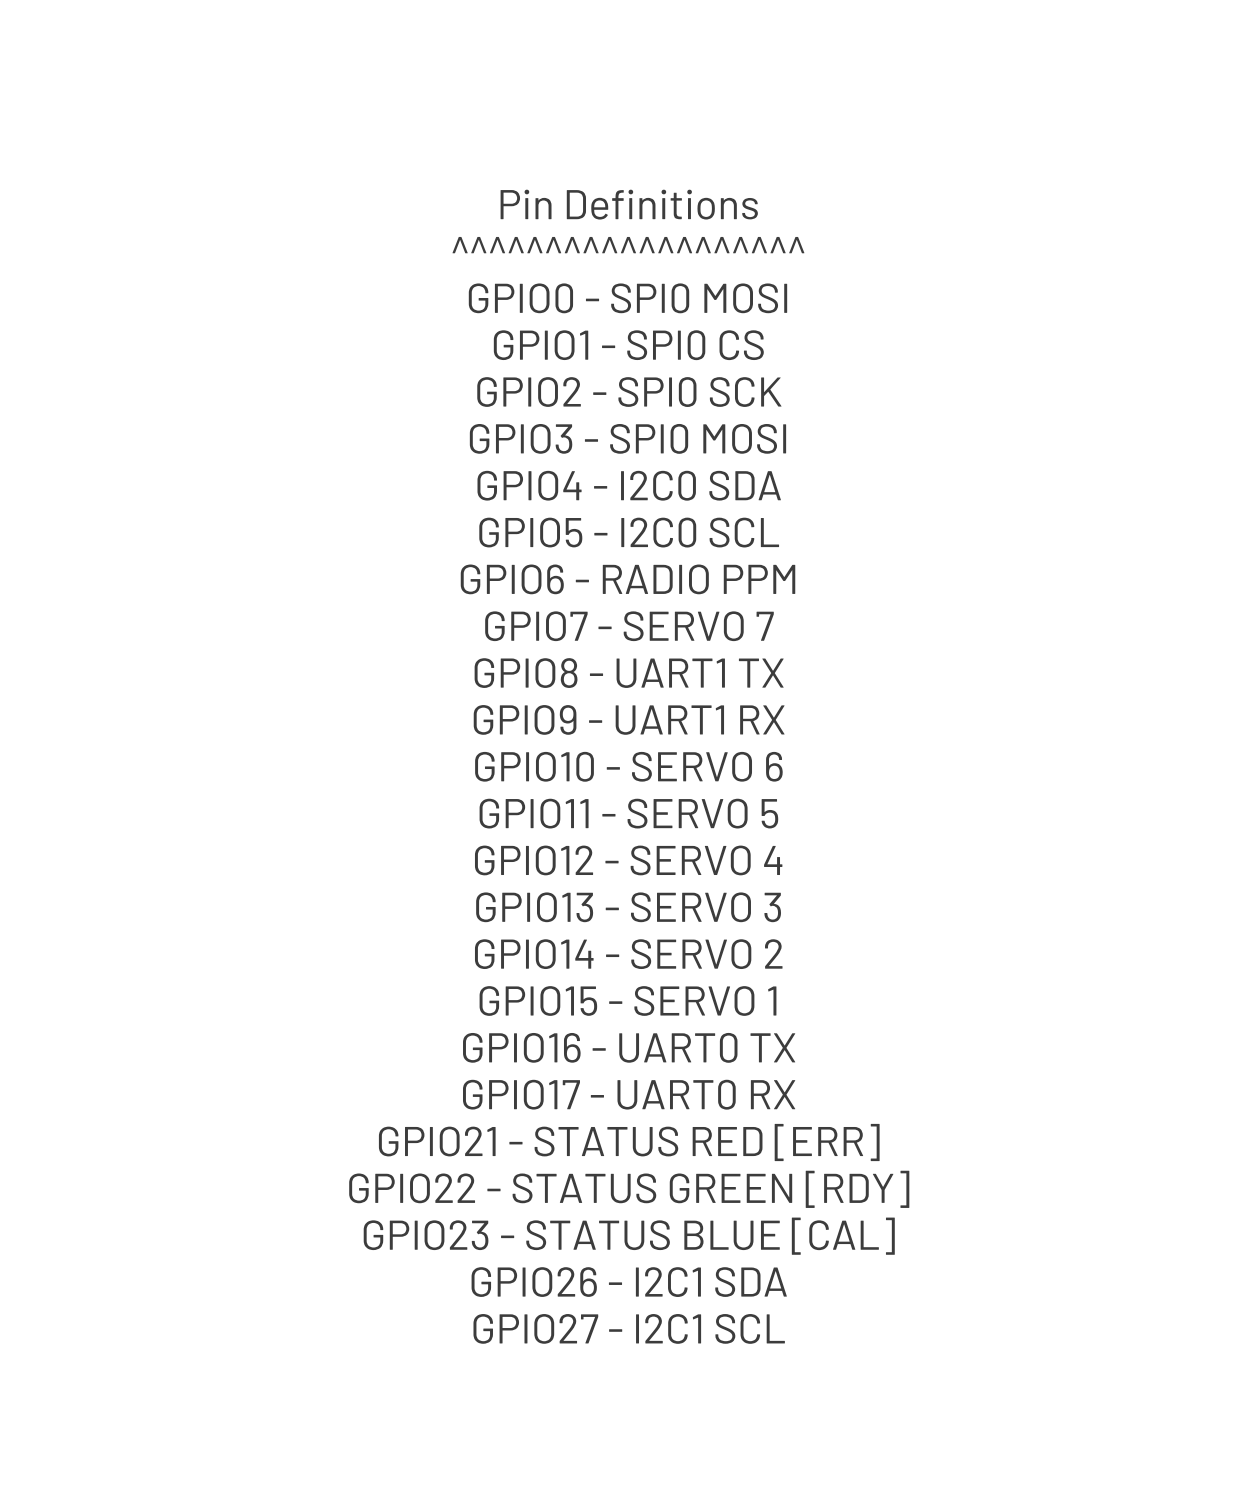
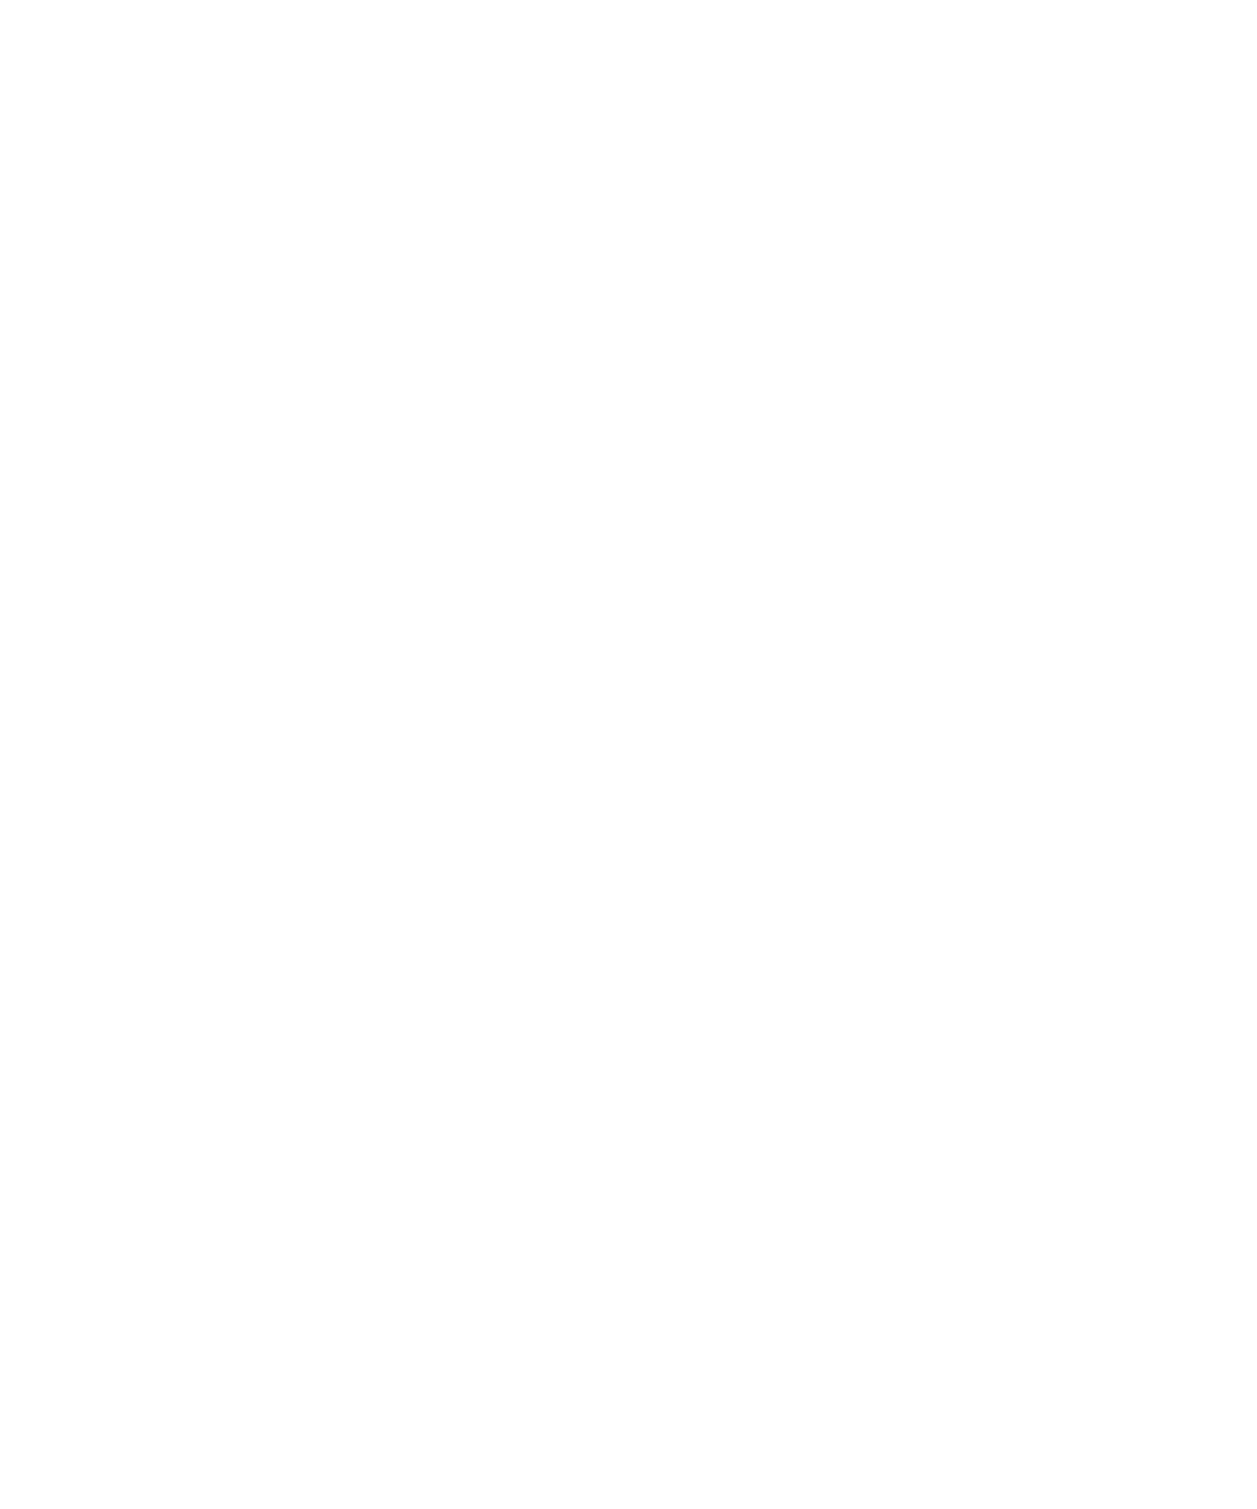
text: Pin Definitions (629, 204) -> none
text: ^^^^^^^^^^^^^^^^^^^ (628, 245) -> none
text: GPIO0 - SPI0 MOSI (627, 298) -> none
text: GPIO1 - SPI0 CS (628, 345) -> none
text: GPIO2 - SPI0 SCK (629, 392) -> none
text: GPIO3 - SPI0 MOSI (627, 438) -> none
text: GPIO4 - I2C0 SDA (629, 485) -> none
text: GPIO5 - I2C0 SCL (629, 532) -> none
text: GPIO6 - RADIO PPM (628, 579) -> none
text: GPIO7 - SERVO 7 (629, 626) -> none
text: GPIO8 - UART1 TX (629, 673) -> none
text: GPIO9 - UART1 RX (629, 719) -> none
text: GPIO10 - SERVO 6 (628, 766) -> none
text: GPIO11 - SERVO 5 (628, 813) -> none
text: GPIO12 - SERVO 4 (628, 860) -> none
text: GPIO13 - SERVO 3 (628, 907) -> none
text: GPIO14 - SERVO 2 (628, 954) -> none
text: GPIO15 - SERVO 1 (628, 1000) -> none
text: GPIO16 - UART0 TX (629, 1047) -> none
text: GPIO17 - UART0 RX (629, 1094) -> none
text: GPIO21 - STATUS RED [ERR] (629, 1142) -> none
text: GPIO22 - STATUS GREEN [RDY] (629, 1189) -> none
text: GPIO23 - STATUS BLUE [CAL] (629, 1236) -> none
text: GPIO26 - I2C1 SDA (629, 1282) -> none
text: GPIO27 - I2C1 SCL (629, 1328) -> none

